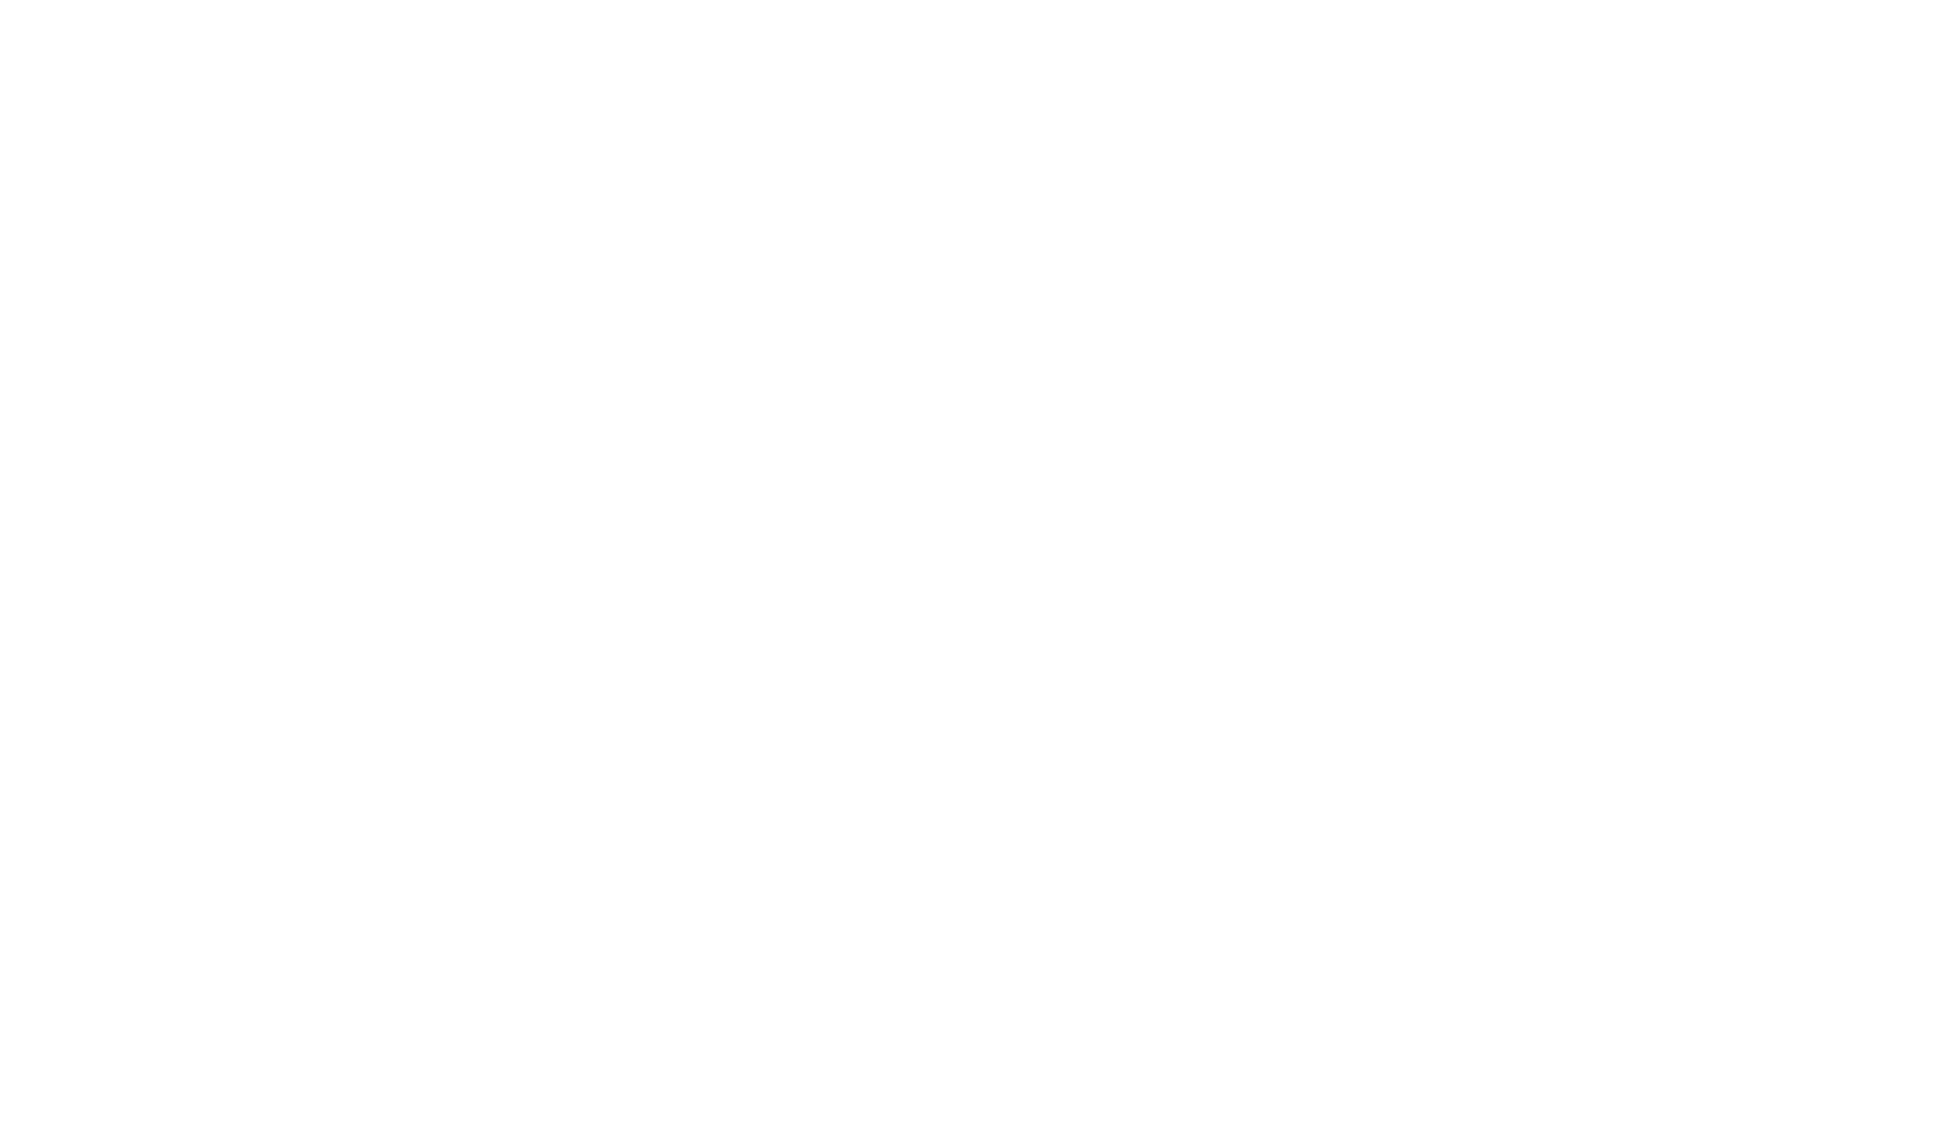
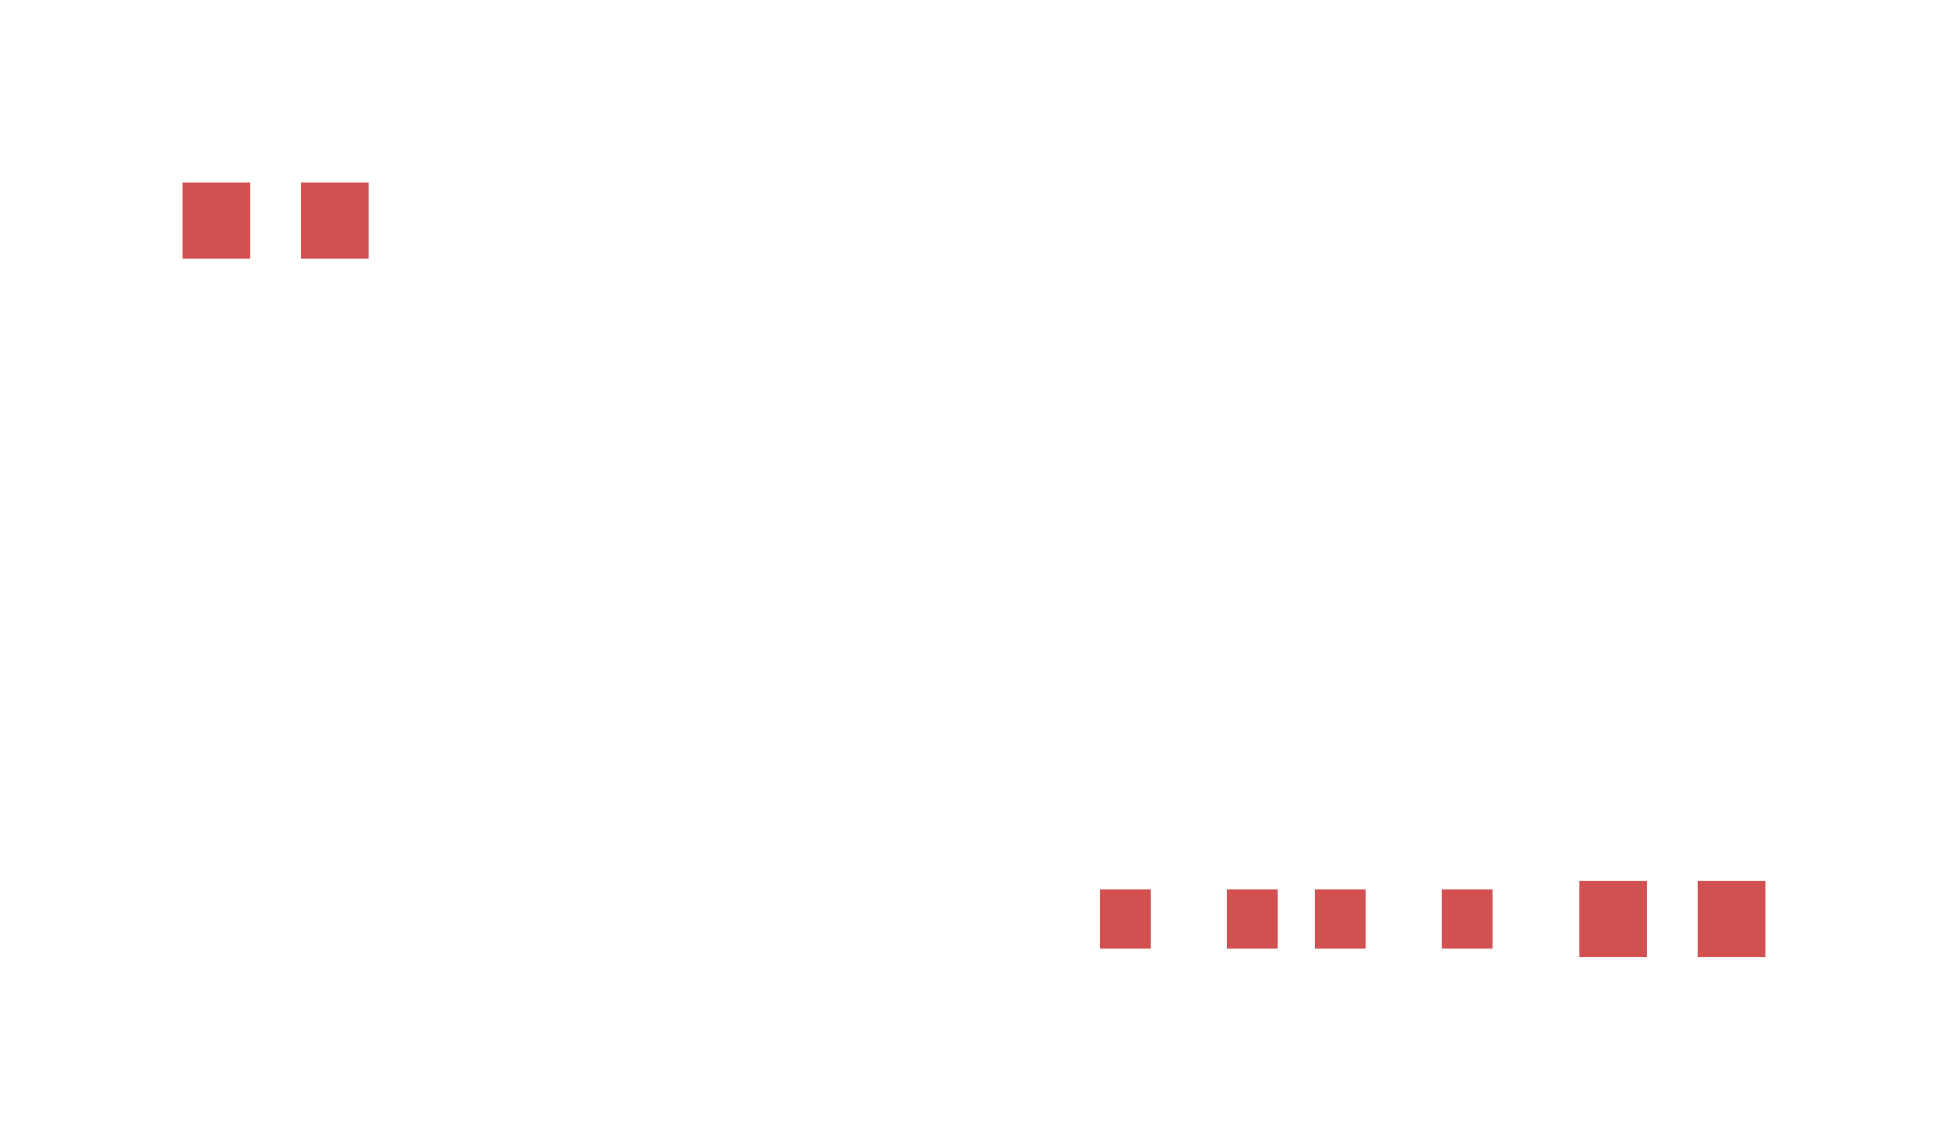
part: none -> (275, 220)
part: none -> (1188, 918)
part: none -> (1403, 918)
part: none -> (1672, 918)

